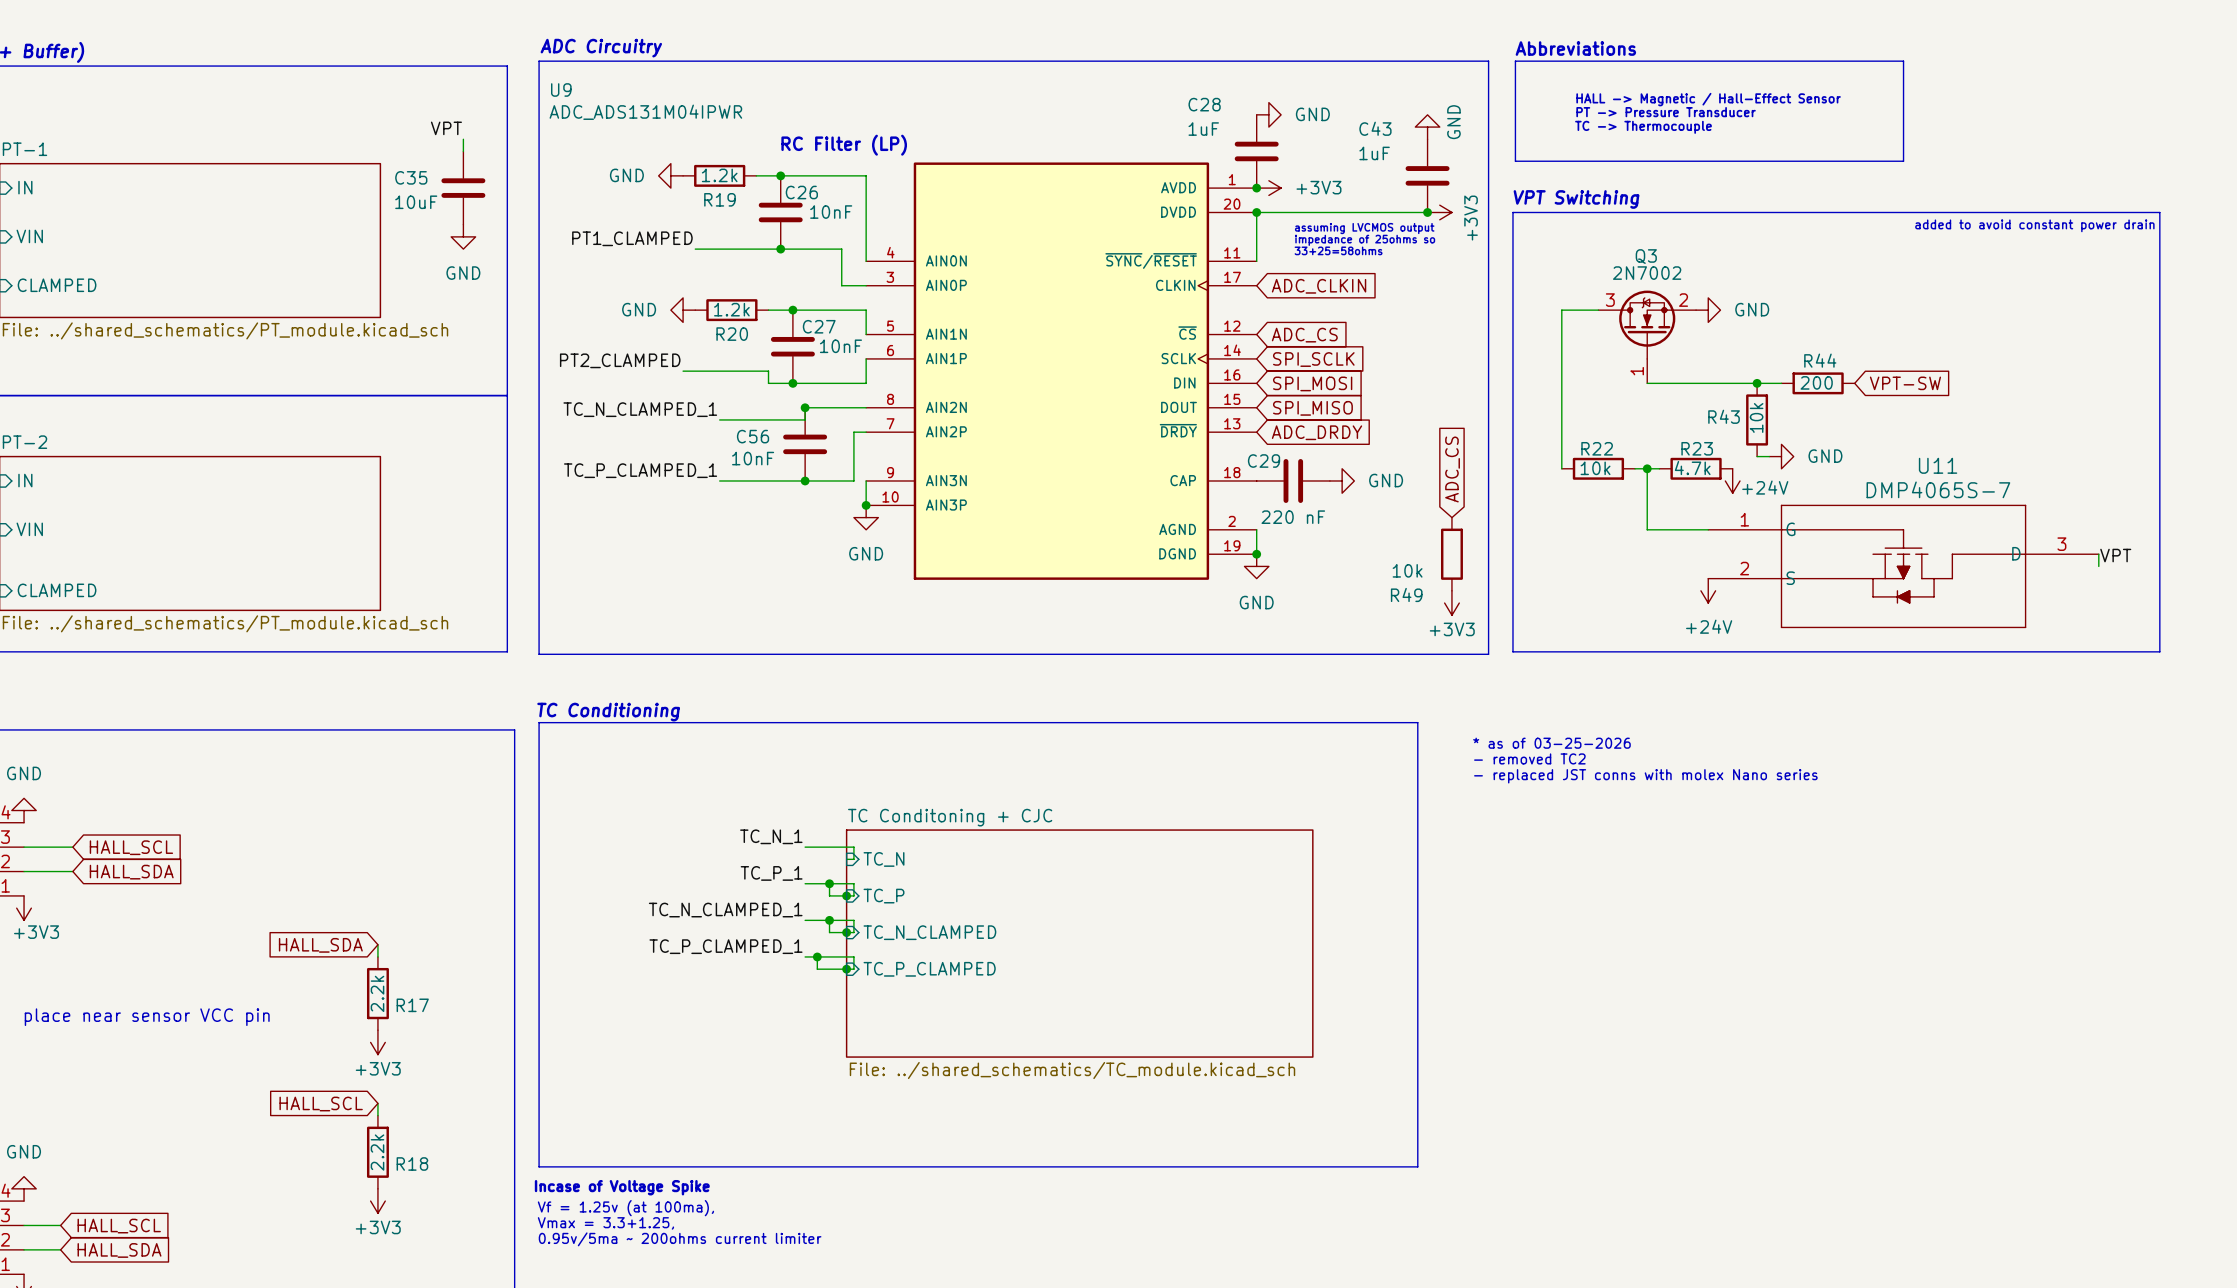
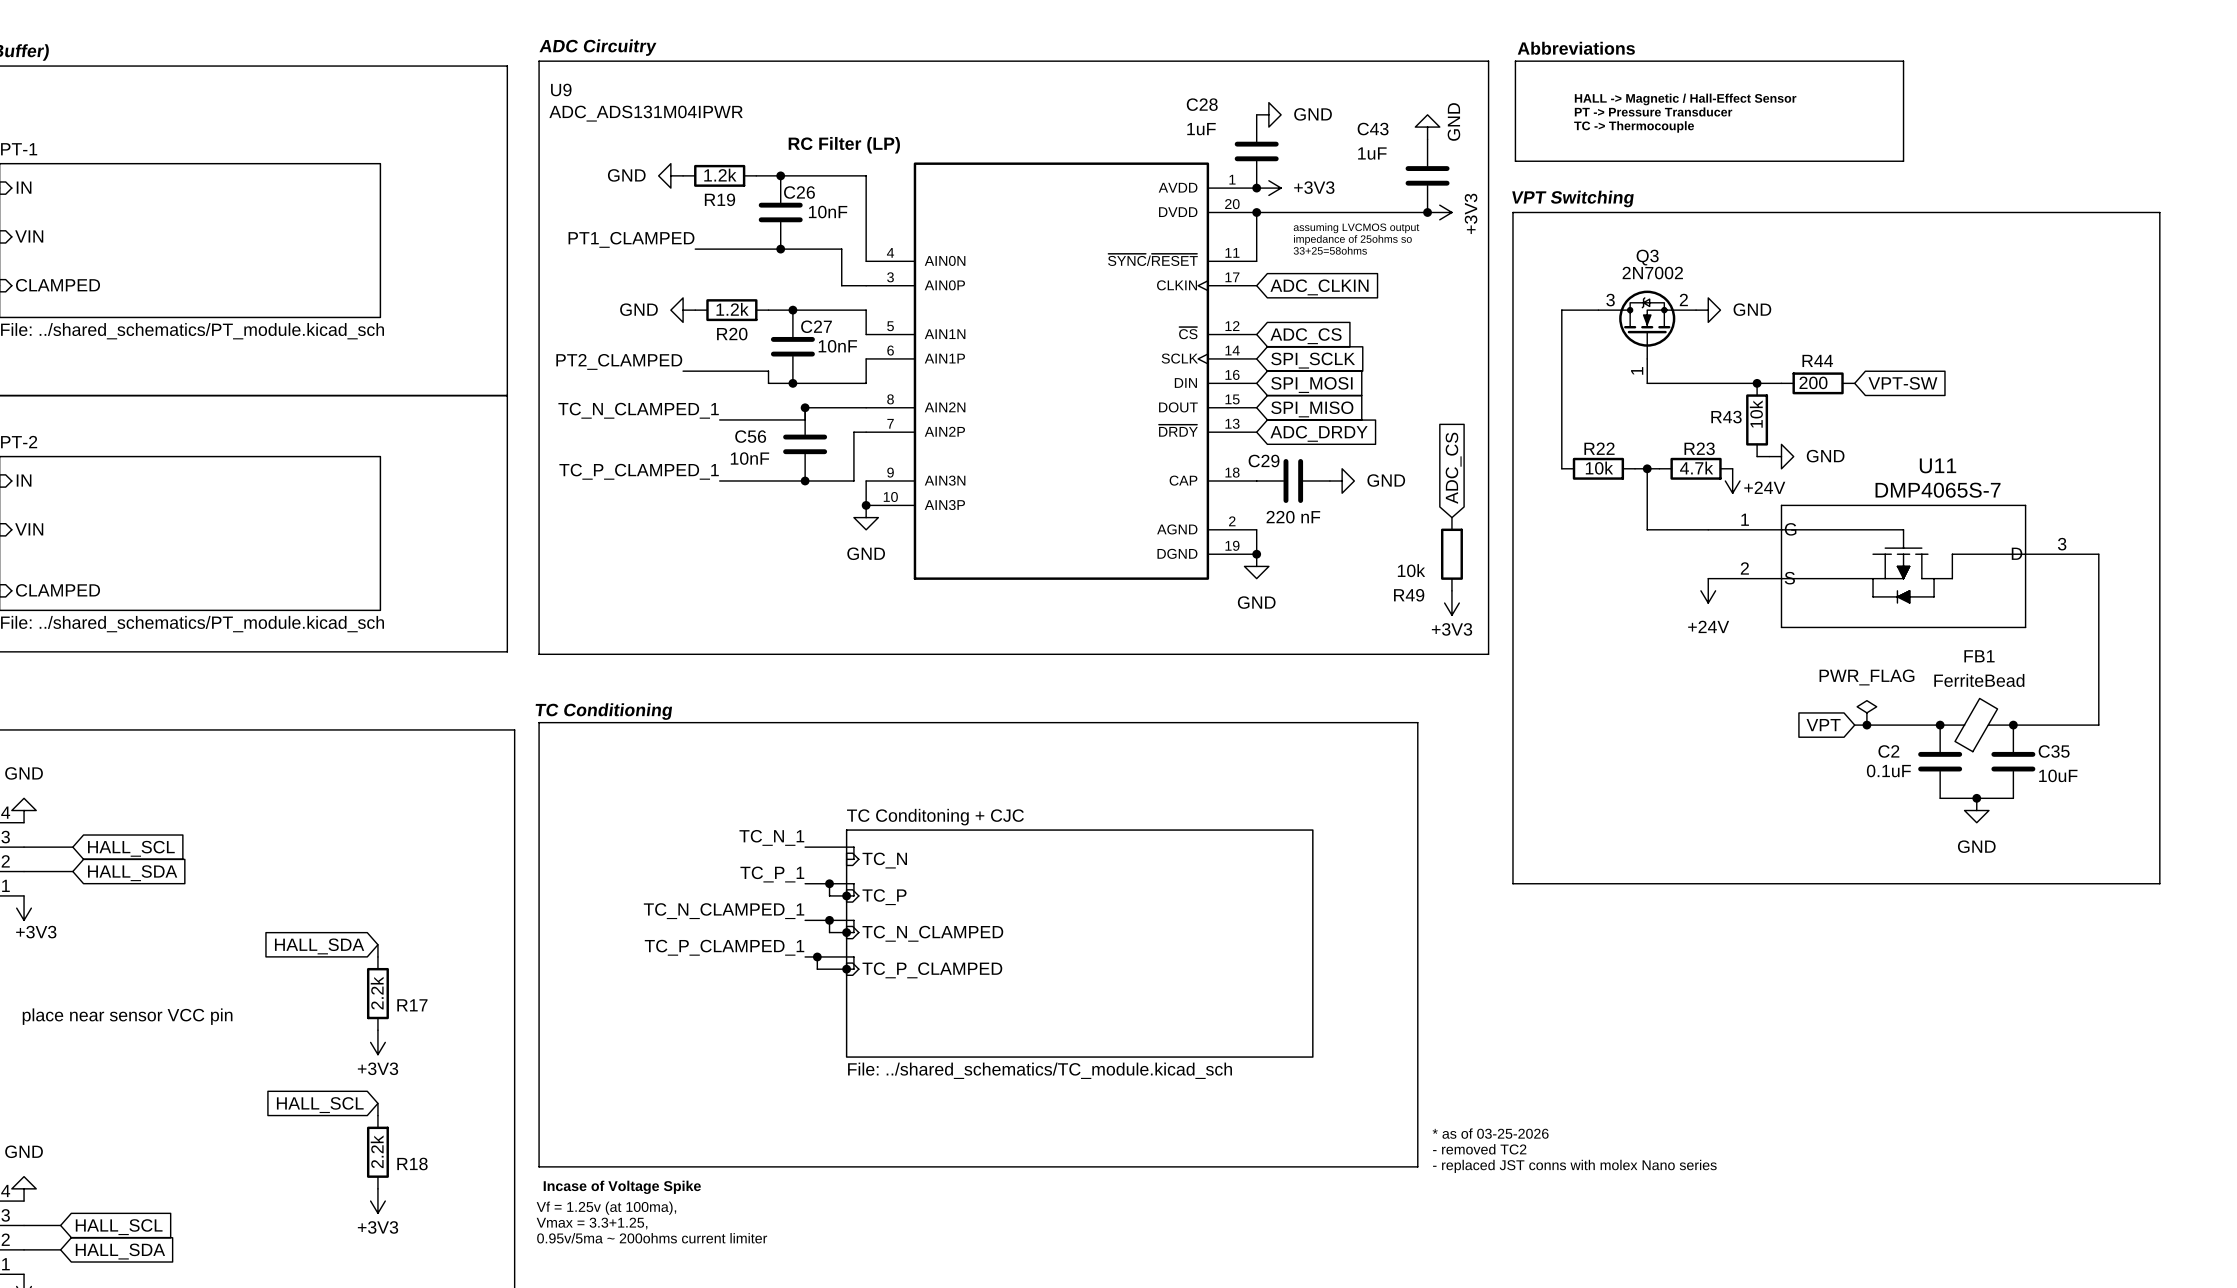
label: VPT (446, 128) -> none
wire: (463, 139) (463, 151) -> none
C35 name position: C35 (411, 177) -> C35 (2054, 751)
C35 position: (463, 188) -> (2013, 761)
C35 value position: 10uF (416, 202) -> 10uF (2058, 775)
text: added to avoid constant power drain (2034, 225) -> none
power symbol: GND (463, 236) -> none
label: VPT (2115, 555) -> none
wire: none -> (2098, 566) (2098, 725) (2013, 725)
line: (1512, 651) (2159, 651) -> (1512, 651) (1512, 883) (2159, 883) (2159, 651)
power symbol: none -> PWR_FLAG (1866, 712)
global label: none -> VPT (1823, 725)
wire: none -> (1854, 725) (1940, 725)
junction: none -> (1866, 725)
junction: none -> (1940, 725)
FB1: none -> FerriteBead (1976, 725)
junction: none -> (2013, 725)
text: * as of 03-25-2026 (1551, 743) -> none
text: - removed TC2 (1529, 758) -> none
C2: none -> 0.1uF (1940, 761)
text: - replaced JST conns with molex Nano series (1645, 776) -> none
wire: none -> (1940, 798) (2013, 798)
junction: none -> (1976, 798)
power symbol: none -> GND (1976, 810)
text: none -> * as of 03-25-2026 (1490, 1133)
text: none -> - removed TC2 (1479, 1149)
text: none -> - replaced JST conns with molex Nano series (1574, 1166)

